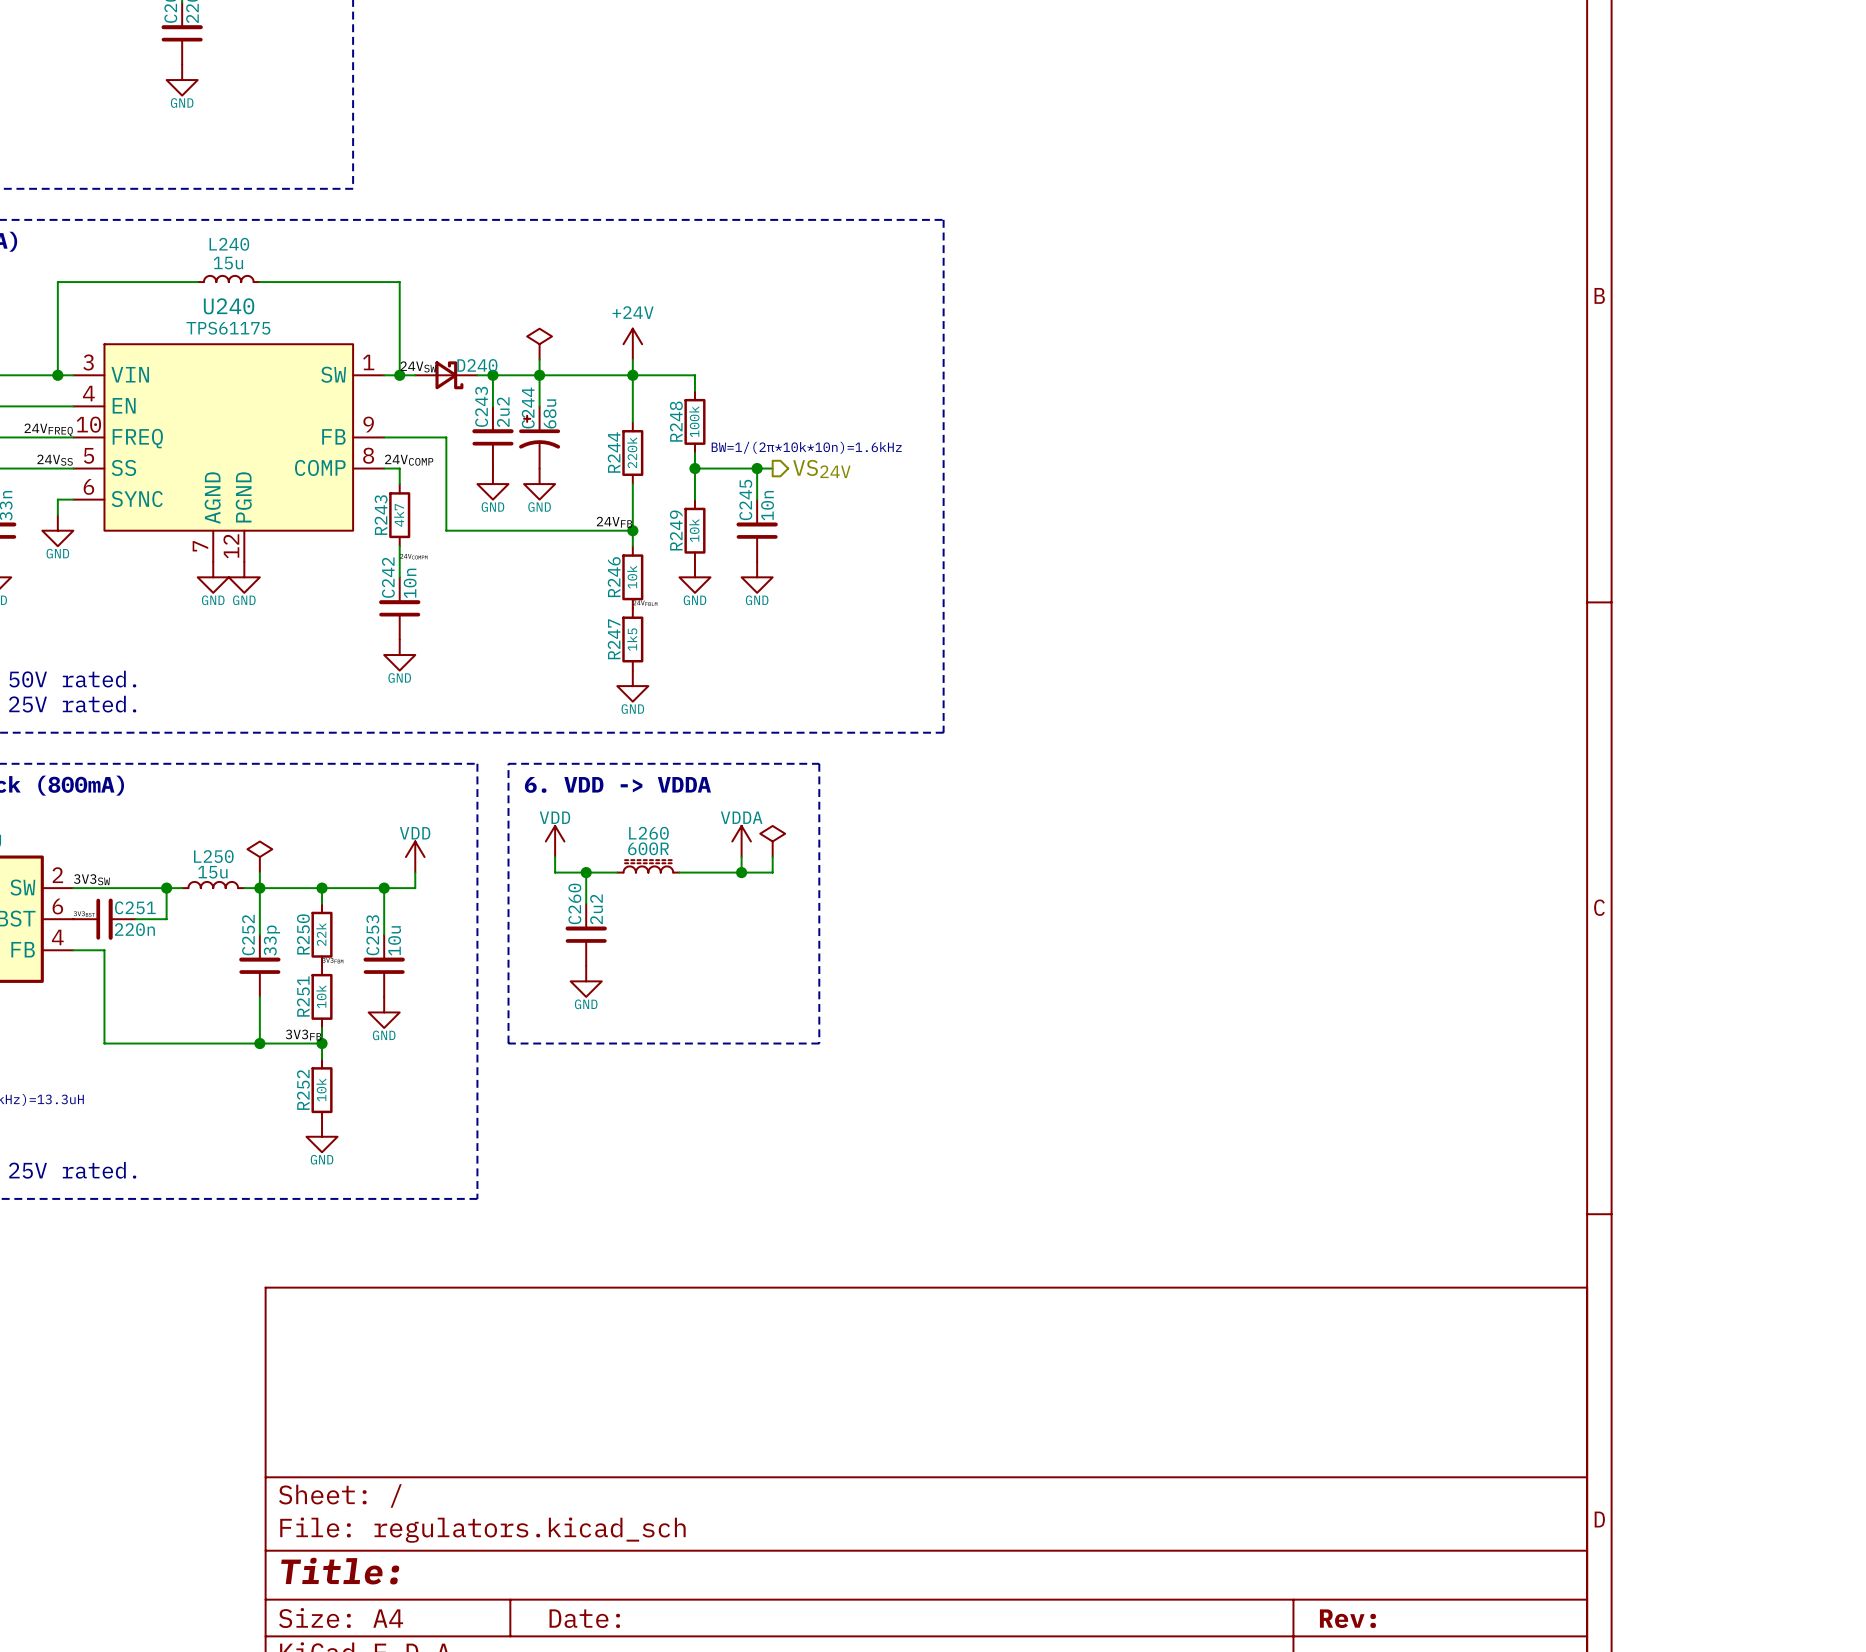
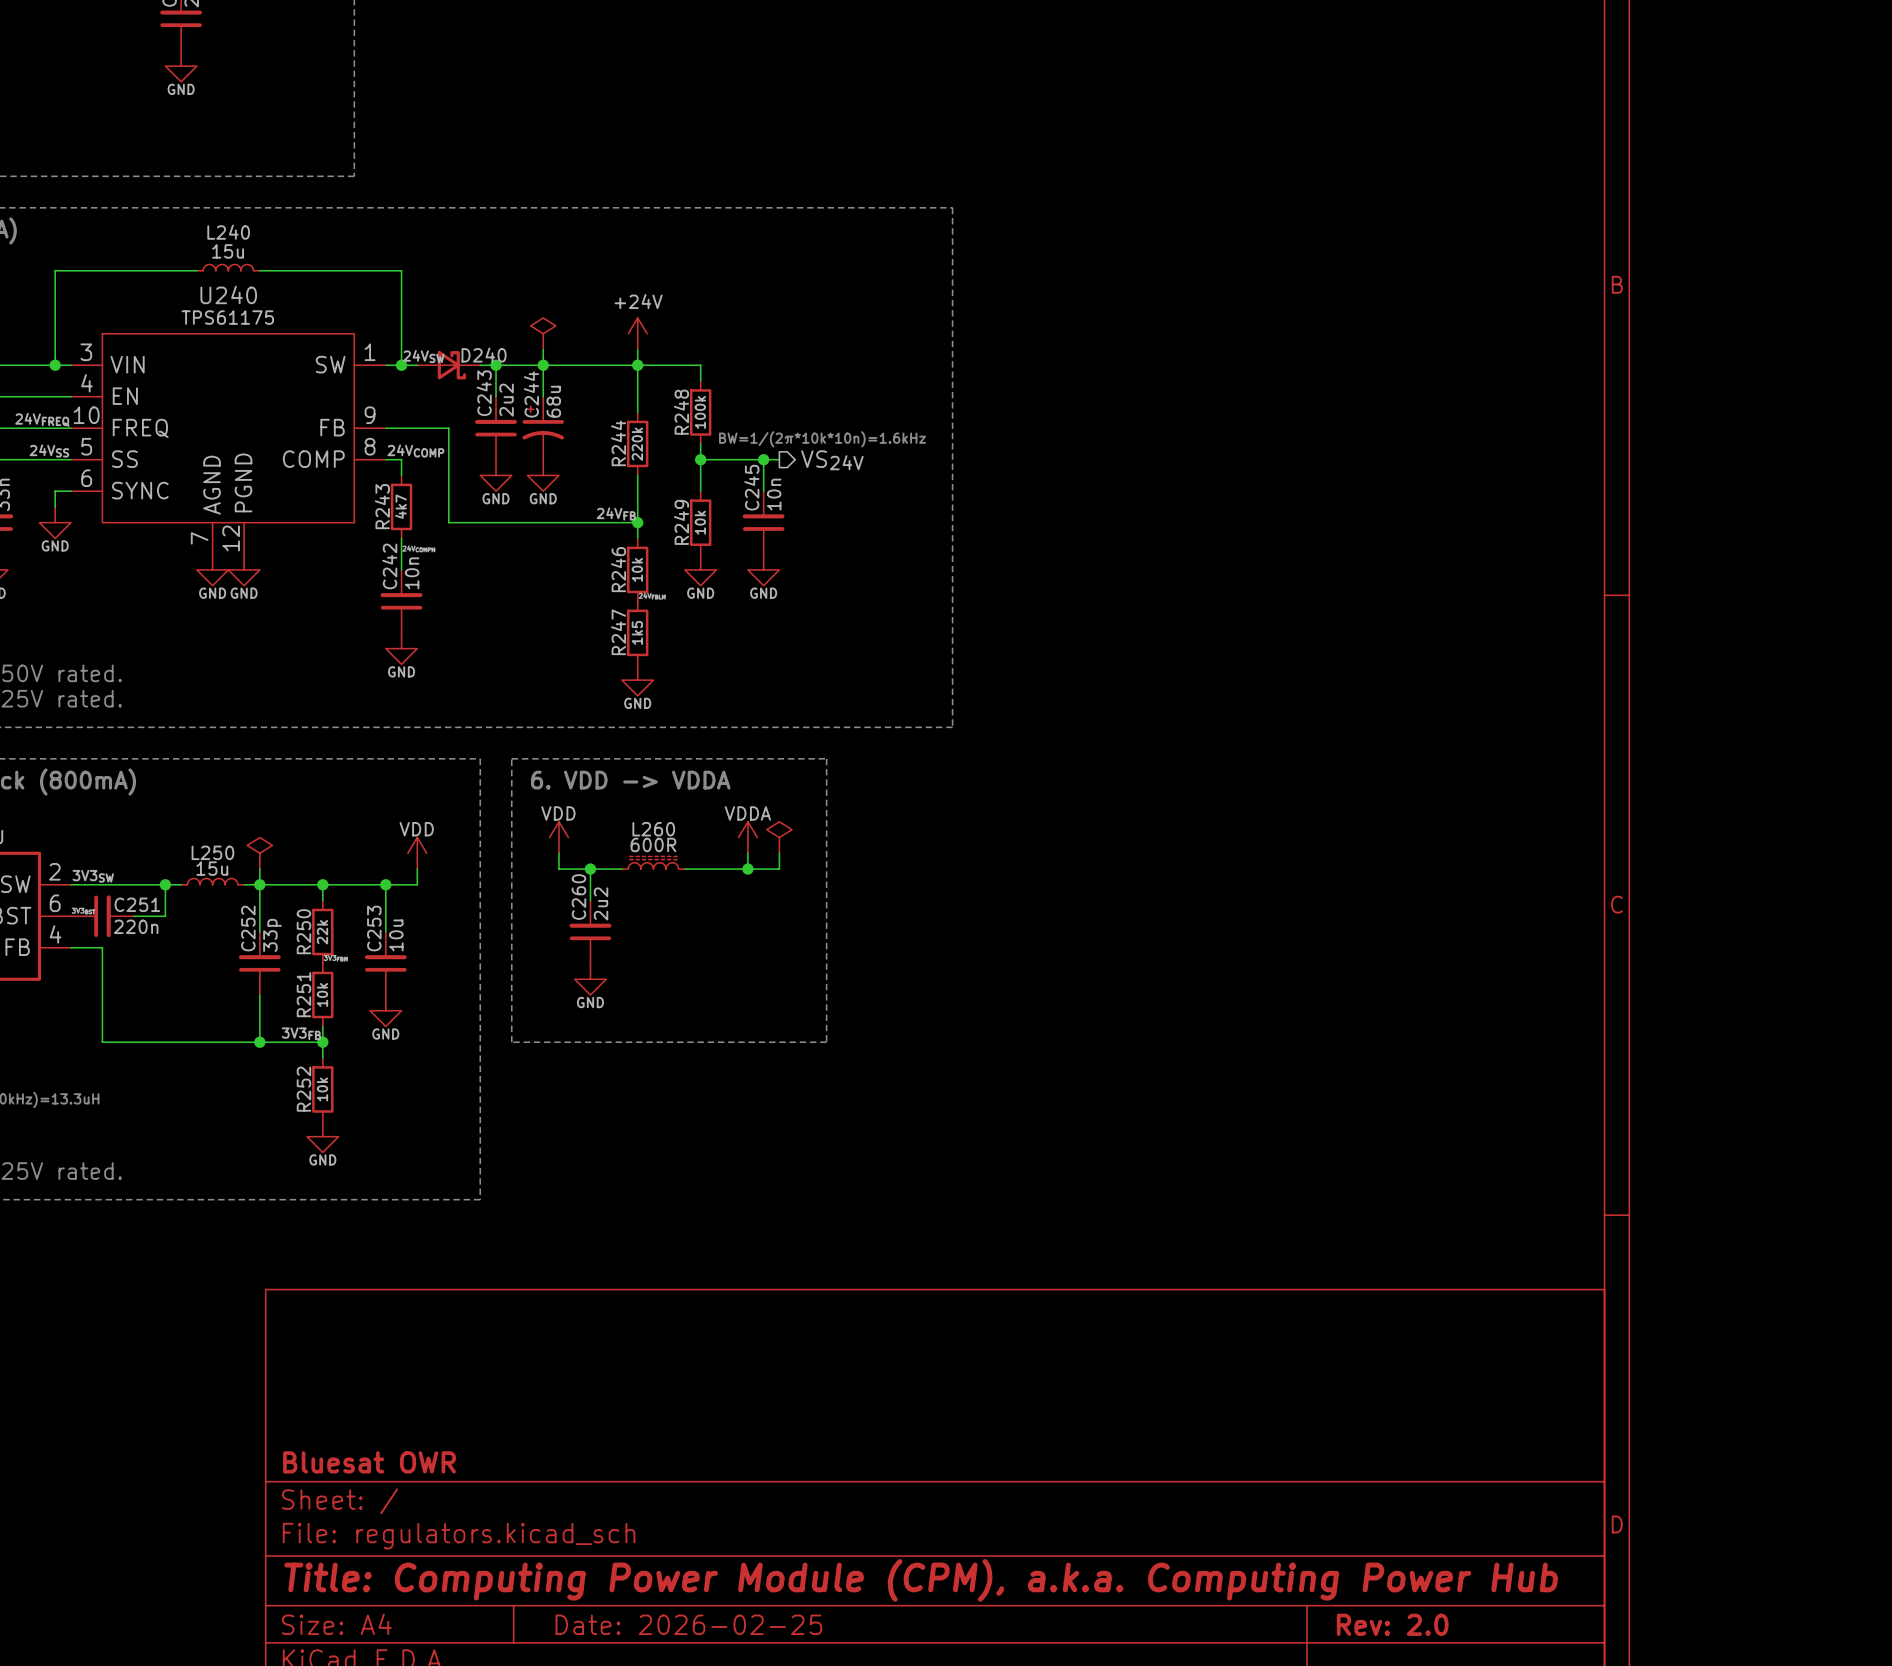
title block: none -> Bluesat OWR (369, 1462)
title block: Title: (340, 1571) -> Title: Computing Power Module (CPM), a.k.a. Computing Power Hub (921, 1580)
title block: Date: (584, 1618) -> Date: 2026-02-25 (688, 1624)
title block: Rev: (1347, 1618) -> Rev: 2.0 (1392, 1624)

